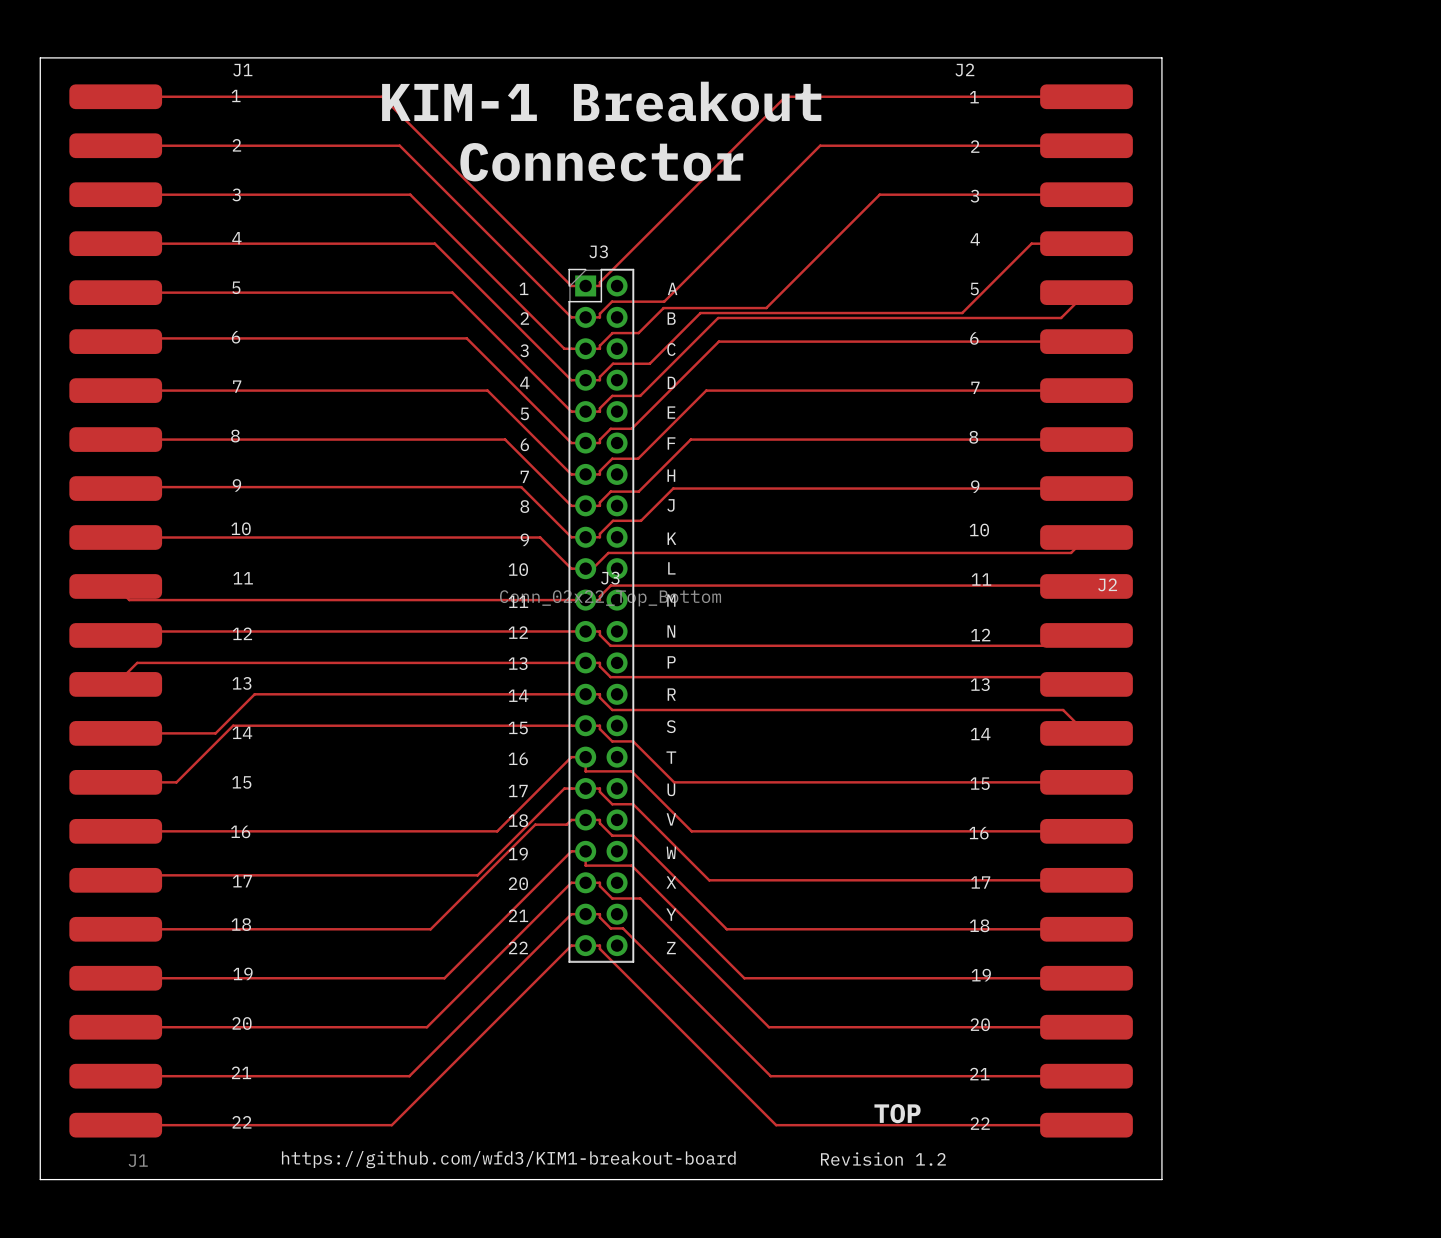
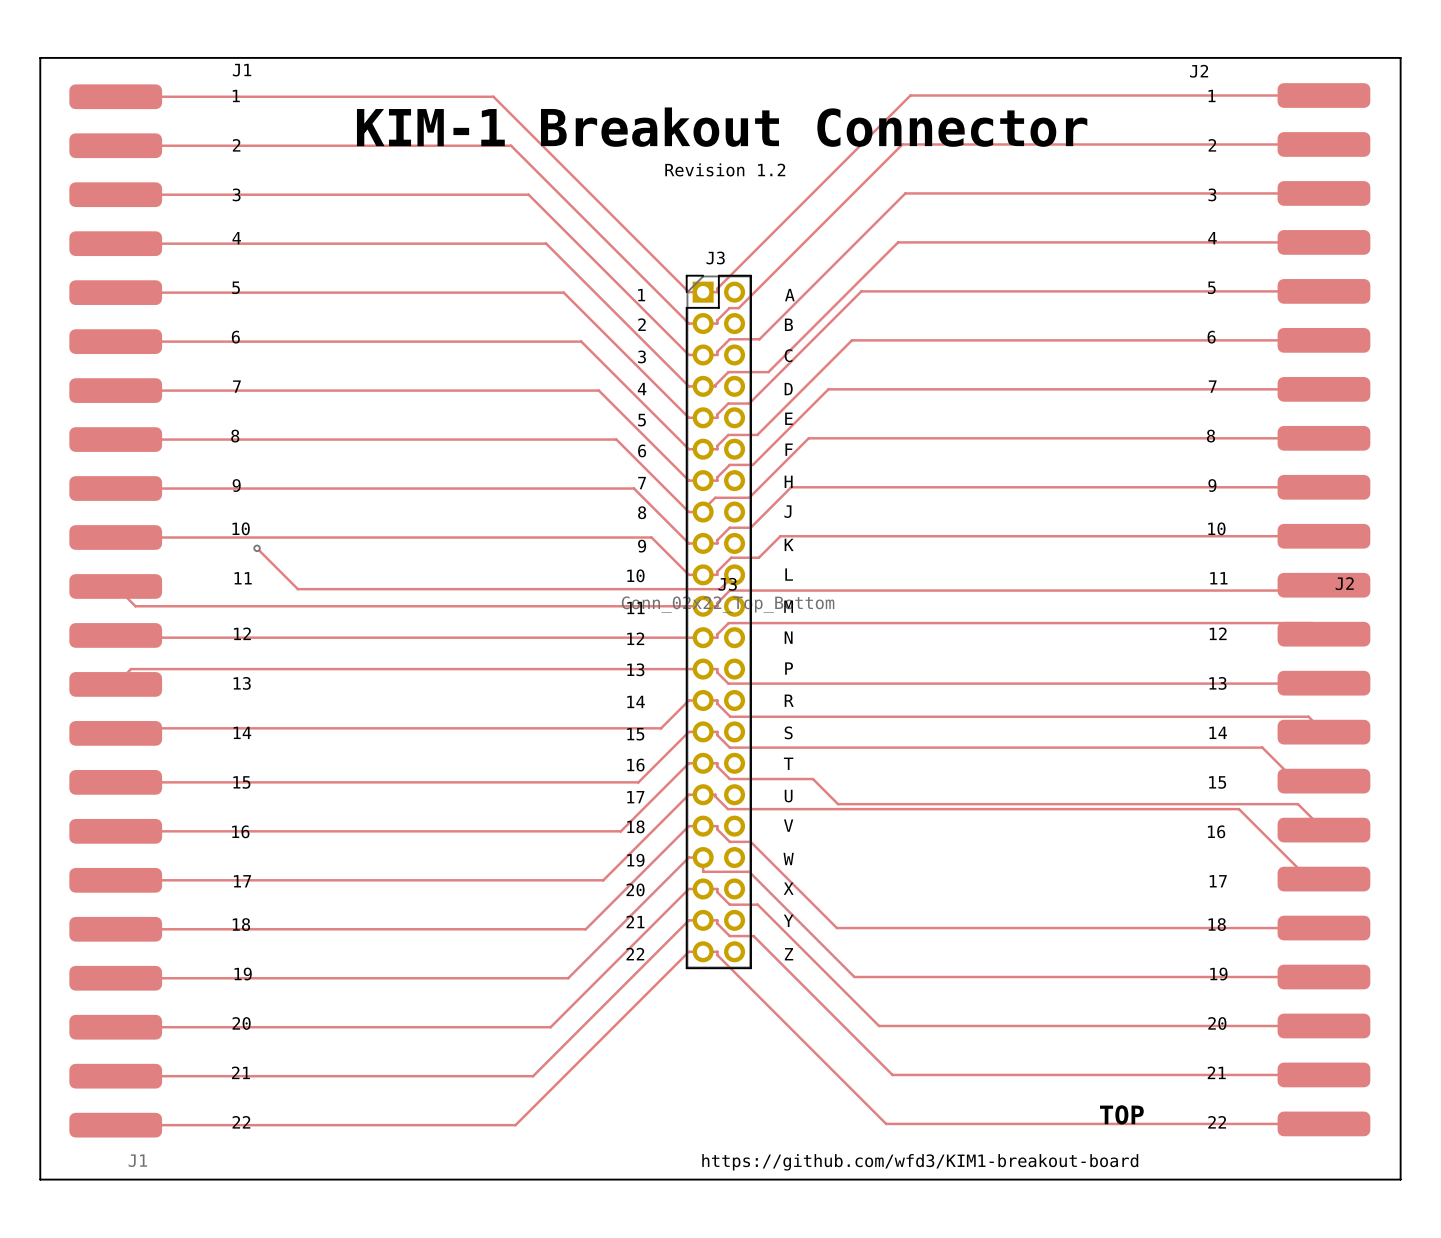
board edge: (1161, 57) (1161, 1179) -> (1161, 57) (1400, 57) (1400, 1179) (1161, 1179)
text position: J2 (964, 70) -> J2 (1199, 71)
track: (382, 96) (571, 285) (599, 285) (599, 282) (785, 96) (1086, 96) -> (382, 96) (493, 96) (688, 292) (717, 292) (717, 288) (910, 95) (1323, 95)
text: KIM-1 Breakout (601, 101) -> KIM-1 Breakout Connector (722, 127)
track: (399, 145) (571, 317) (599, 317) (599, 313) (612, 301) (664, 301) (820, 145) (1086, 145) -> none
text: Connector (601, 162) -> none
text: none -> Revision 1.2 (725, 169)
track: none -> (1323, 193) (905, 193) (759, 339) (729, 339) (717, 351) (717, 354) (688, 354) (528, 194) (410, 194)
track: (410, 194) (564, 348) (599, 348) (599, 345) (612, 333) (638, 333) (663, 308) (729, 308) -> (399, 145) (511, 145) (688, 323) (717, 323) (717, 320) (729, 308)
track: (1086, 194) (879, 194) (766, 308) (738, 308) -> (1323, 144) (902, 144) (738, 308)
track: (434, 243) (571, 380) (599, 380) (599, 376) (613, 363) (649, 363) (700, 313) (962, 313) (1031, 243) (1086, 243) -> (434, 243) (546, 243) (688, 386) (715, 386) (728, 372) (768, 372) (898, 242) (1323, 242)
text position: J3 (598, 251) -> J3 (715, 257)
text position: 1 (523, 288) -> 1 (641, 295)
text position: A (672, 288) -> A (789, 295)
track: (452, 292) (571, 411) (599, 411) (599, 408) (612, 395) (640, 395) (718, 318) (1061, 318) (1086, 292) -> (452, 292) (563, 292) (688, 417) (717, 417) (717, 414) (728, 403) (749, 403) (861, 291) (1323, 291)
text position: 2 (524, 318) -> 2 (642, 324)
text position: B (671, 318) -> B (788, 324)
track: (115, 341) (118, 338) (466, 338) (571, 443) (599, 443) (599, 439) (610, 428) (631, 428) (718, 341) (1086, 341) -> (115, 341) (581, 341) (688, 449) (717, 449) (717, 445) (728, 434) (757, 434) (851, 340) (1323, 340)
text position: C (671, 349) -> C (788, 355)
text position: 3 (524, 350) -> 3 (642, 356)
text position: 4 (524, 382) -> 4 (642, 389)
text position: D (671, 382) -> D (788, 389)
track: (487, 390) (571, 474) (599, 474) (599, 471) (612, 458) (638, 458) (706, 390) (1086, 390) -> (487, 390) (598, 390) (688, 480) (717, 480) (717, 477) (729, 464) (752, 464) (828, 389) (1323, 389)
text position: E (671, 412) -> E (788, 418)
text position: 5 (524, 413) -> 5 (642, 420)
track: (505, 439) (571, 505) (599, 505) (599, 502) (610, 491) (638, 491) (690, 439) (1086, 439) -> (505, 439) (616, 439) (688, 512) (703, 512) (715, 497) (749, 497) (808, 438) (1323, 438)
text position: F (671, 443) -> F (789, 449)
text position: 6 (524, 444) -> 6 (642, 450)
text position: H (671, 475) -> H (788, 481)
text position: 7 (524, 476) -> 7 (642, 483)
track: (115, 488) (521, 487) (571, 537) (599, 537) (599, 533) (613, 520) (640, 520) (673, 488) (1086, 488) -> (115, 488) (633, 488) (688, 543) (717, 543) (717, 540) (729, 527) (750, 527) (791, 487) (1323, 487)
text position: J (670, 505) -> J (787, 511)
text position: 8 (524, 506) -> 8 (642, 512)
track: (540, 537) (571, 568) (592, 568) (608, 552) (1071, 552) (1086, 537) -> (540, 537) (651, 537) (688, 574) (717, 574) (717, 571) (731, 557) (758, 557) (780, 536) (1323, 536)
text position: K (671, 538) -> K (789, 544)
text position: 9 (524, 539) -> 9 (642, 546)
track: none -> (257, 548) (297, 589) (720, 589) (734, 574)
via: none -> (257, 548)
text position: L (671, 568) -> L (789, 574)
text position: 10 (518, 569) -> 10 (635, 575)
track: (1086, 586) (610, 585) (599, 596) (599, 600) (129, 600) -> (1323, 585) (1318, 590) (729, 590) (717, 602) (717, 606) (135, 606) (129, 600)
text position: M (671, 600) -> M (788, 606)
text position: 11 (518, 601) -> 11 (635, 607)
J2 position: (1086, 610) -> (1323, 609)
J3 position: (601, 615) -> (718, 621)
text position: N (671, 631) -> N (788, 637)
text position: 12 (518, 632) -> 12 (635, 638)
track: (115, 635) (119, 631) (599, 631) (599, 635) (610, 645) (1076, 645) (1086, 635) -> (115, 635) (117, 637) (717, 637) (717, 634) (728, 623) (1312, 623) (1323, 634)
text position: P (671, 662) -> P (789, 668)
text position: 13 (518, 663) -> 13 (635, 669)
track: (131, 669) (137, 662) (599, 662) (599, 666) (610, 677) (1079, 677) (1086, 684) -> (131, 669) (717, 669) (717, 672) (728, 683) (1323, 683)
text position: R (671, 694) -> R (789, 700)
text position: 14 (518, 695) -> 14 (636, 701)
text position: S (671, 726) -> S (788, 732)
text position: 15 (518, 728) -> 15 (635, 734)
track: (115, 733) (215, 733) (254, 694) (599, 694) (599, 697) (612, 710) (1063, 710) (1086, 733) -> (115, 733) (120, 728) (661, 728) (688, 700) (717, 700) (717, 703) (730, 716) (1308, 716) (1323, 732)
text position: T (671, 757) -> T (788, 763)
text position: 16 (518, 758) -> 16 (635, 765)
track: (176, 782) (233, 725) (599, 725) (599, 729) (612, 741) (633, 741) (674, 782) (1086, 782) -> (176, 782) (638, 782) (688, 731) (717, 731) (717, 735) (729, 747) (1262, 747) (1295, 781) (1323, 781)
text position: U (671, 789) -> U (788, 796)
text position: 17 (518, 790) -> 17 (635, 797)
text position: V (671, 819) -> V (788, 825)
text position: 18 (518, 820) -> 18 (635, 826)
track: (497, 831) (571, 757) (585, 757) (585, 771) (631, 771) (691, 831) (1086, 831) -> (497, 831) (620, 831) (688, 763) (717, 763) (717, 766) (729, 779) (812, 779) (838, 804) (1298, 804) (1323, 830)
text position: W (671, 852) -> W (788, 859)
text position: 19 (518, 853) -> 19 (635, 860)
track: (115, 880) (120, 875) (477, 875) (564, 788) (599, 788) (599, 791) (612, 804) (633, 804) (709, 880) (1086, 880) -> (115, 880) (603, 880) (688, 794) (715, 794) (727, 809) (1238, 809) (1308, 879) (1323, 879)
text position: X (671, 882) -> X (788, 888)
text position: 20 (518, 883) -> 20 (635, 889)
text position: Y (671, 914) -> Y (788, 920)
text position: 21 (518, 915) -> 21 (635, 921)
track: (430, 929) (535, 824) (566, 824) (571, 819) (599, 819) (599, 823) (612, 835) (633, 835) (726, 929) (1086, 929) -> (430, 929) (585, 929) (688, 826) (717, 826) (717, 829) (729, 841) (750, 841) (836, 928) (1323, 928)
text position: 22 (518, 947) -> 22 (635, 954)
text position: Z (671, 948) -> Z (789, 954)
track: (444, 978) (571, 851) (585, 851) (585, 865) (631, 865) (744, 978) (1086, 978) -> (444, 978) (568, 978) (688, 857) (703, 857) (703, 871) (749, 871) (854, 977) (1323, 977)
track: (426, 1027) (571, 882) (599, 882) (599, 886) (612, 898) (640, 898) (769, 1027) (1086, 1027) -> (426, 1027) (550, 1027) (688, 888) (717, 888) (717, 892) (729, 904) (757, 904) (879, 1025) (1323, 1025)
track: (409, 1076) (571, 914) (599, 914) (599, 917) (610, 928) (622, 928) (770, 1076) (1086, 1076) -> (409, 1076) (533, 1076) (688, 920) (717, 920) (717, 923) (729, 936) (753, 936) (892, 1074) (1323, 1074)
text position: TOP (897, 1113) -> TOP (1121, 1114)
track: (391, 1125) (571, 945) (599, 945) (599, 948) (776, 1125) (1086, 1125) -> (391, 1125) (515, 1125) (688, 951) (717, 951) (717, 955) (886, 1123) (1323, 1123)
text: https://github.com/wfd3/KIM1-breakout-board (508, 1159) -> none
text: Revision 1.2 (883, 1159) -> none
text: none -> https://github.com/wfd3/KIM1-breakout-board (920, 1162)

